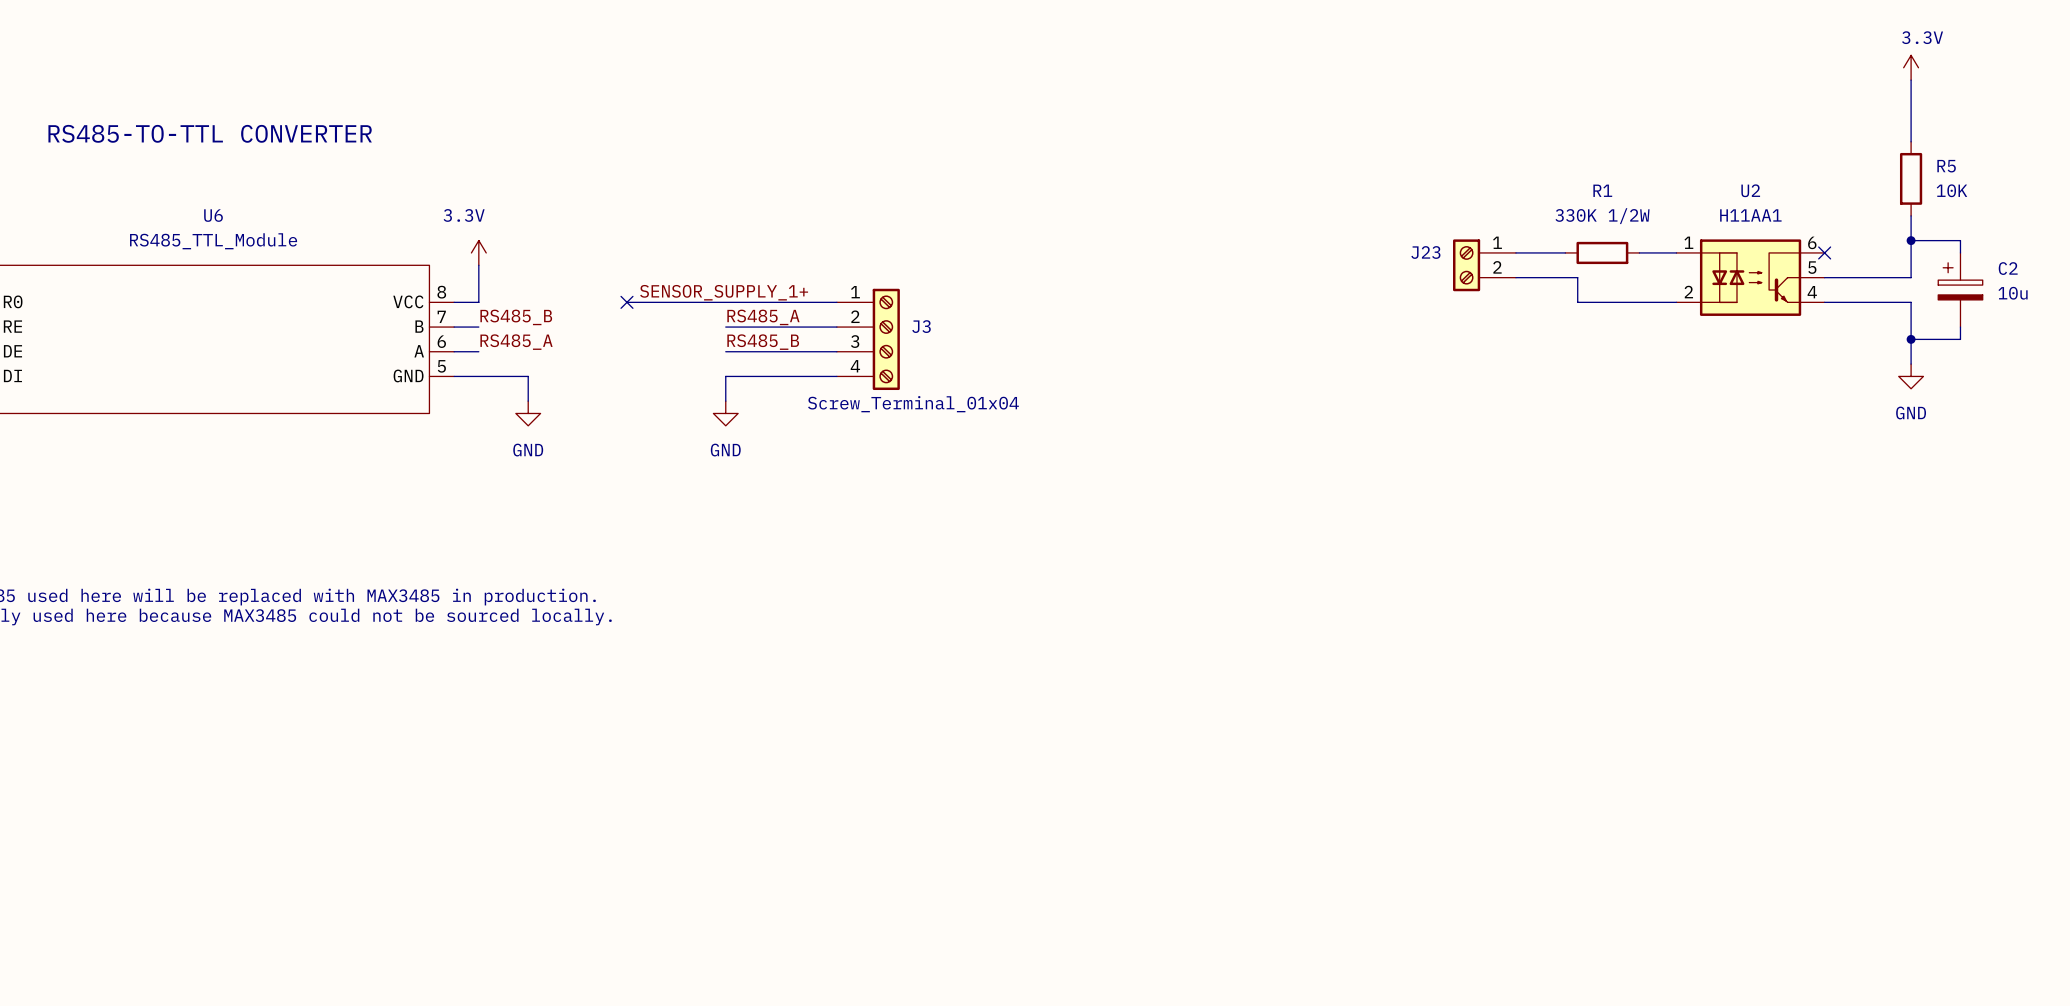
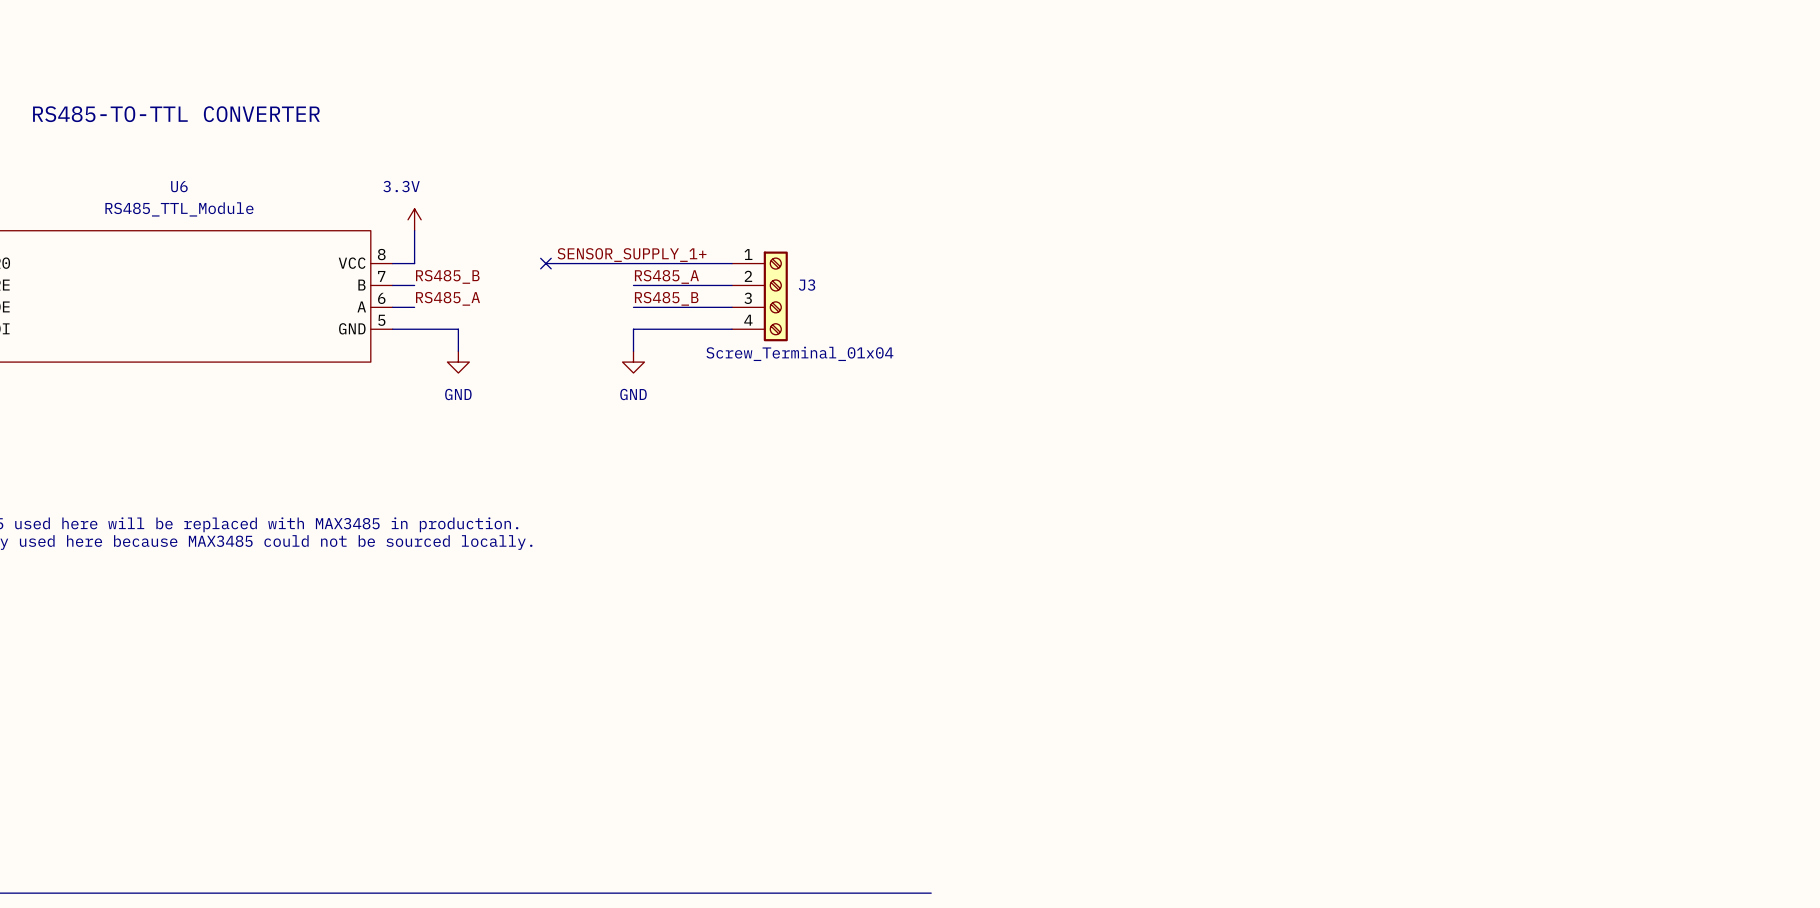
power symbol: 3.3V (1911, 67) -> none
wire: (1911, 80) (1911, 141) -> none
R5: 10K (1911, 178) -> none
wire: (1911, 215) (1911, 277) (1824, 277) -> none
wire: (1911, 240) (1960, 240) (1960, 252) -> none
junction: (1911, 240) -> none
wire: (1515, 252) (1565, 252) -> none
R1: 330K 1/2W (1602, 252) -> none
wire: (1639, 252) (1676, 252) -> none
no-connect mark: (1824, 252) -> none
J23: (1484, 265) -> none
wire: (1515, 277) (1577, 277) (1577, 302) (1676, 302) -> none
U2: H11AA1 (1750, 277) -> none
C2: 10u (1960, 290) -> none
wire: (1824, 302) (1911, 302) (1911, 364) -> none
wire: (1960, 327) (1960, 339) (1911, 339) -> none
junction: (1911, 339) -> none
power symbol: GND (1911, 376) -> none

